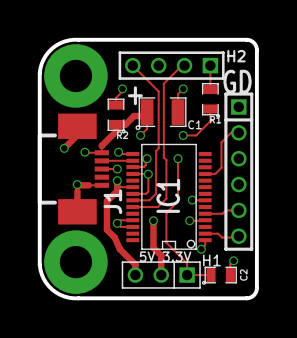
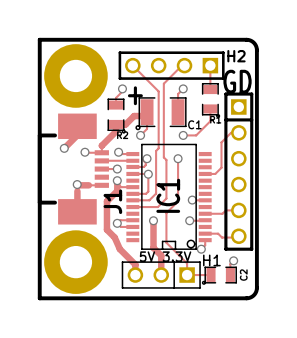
board edge: (78, 39) (64, 41) (52, 48) (43, 59) (39, 73) -> (78, 39) (39, 39) (39, 73)
board edge: (39, 264) (43, 278) (52, 289) (64, 296) (78, 298) -> (39, 264) (39, 298) (78, 298)

